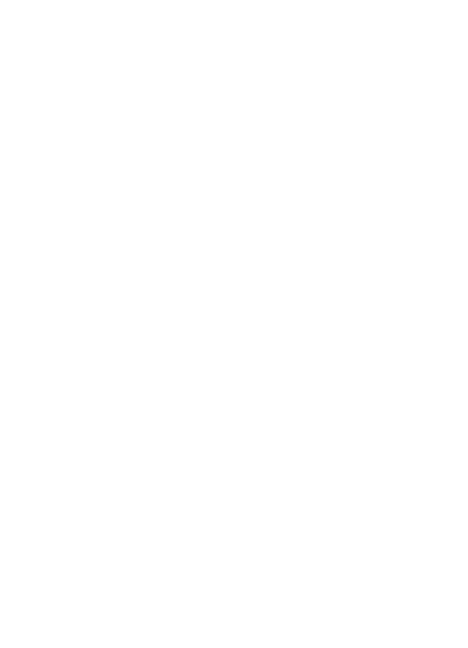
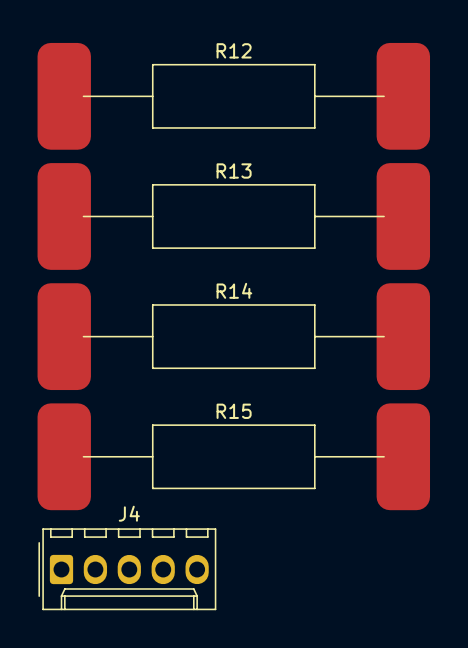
R12: none -> (233, 96)
R13: none -> (233, 216)
R14: none -> (233, 336)
R15: none -> (233, 456)
J4: none -> (127, 569)

